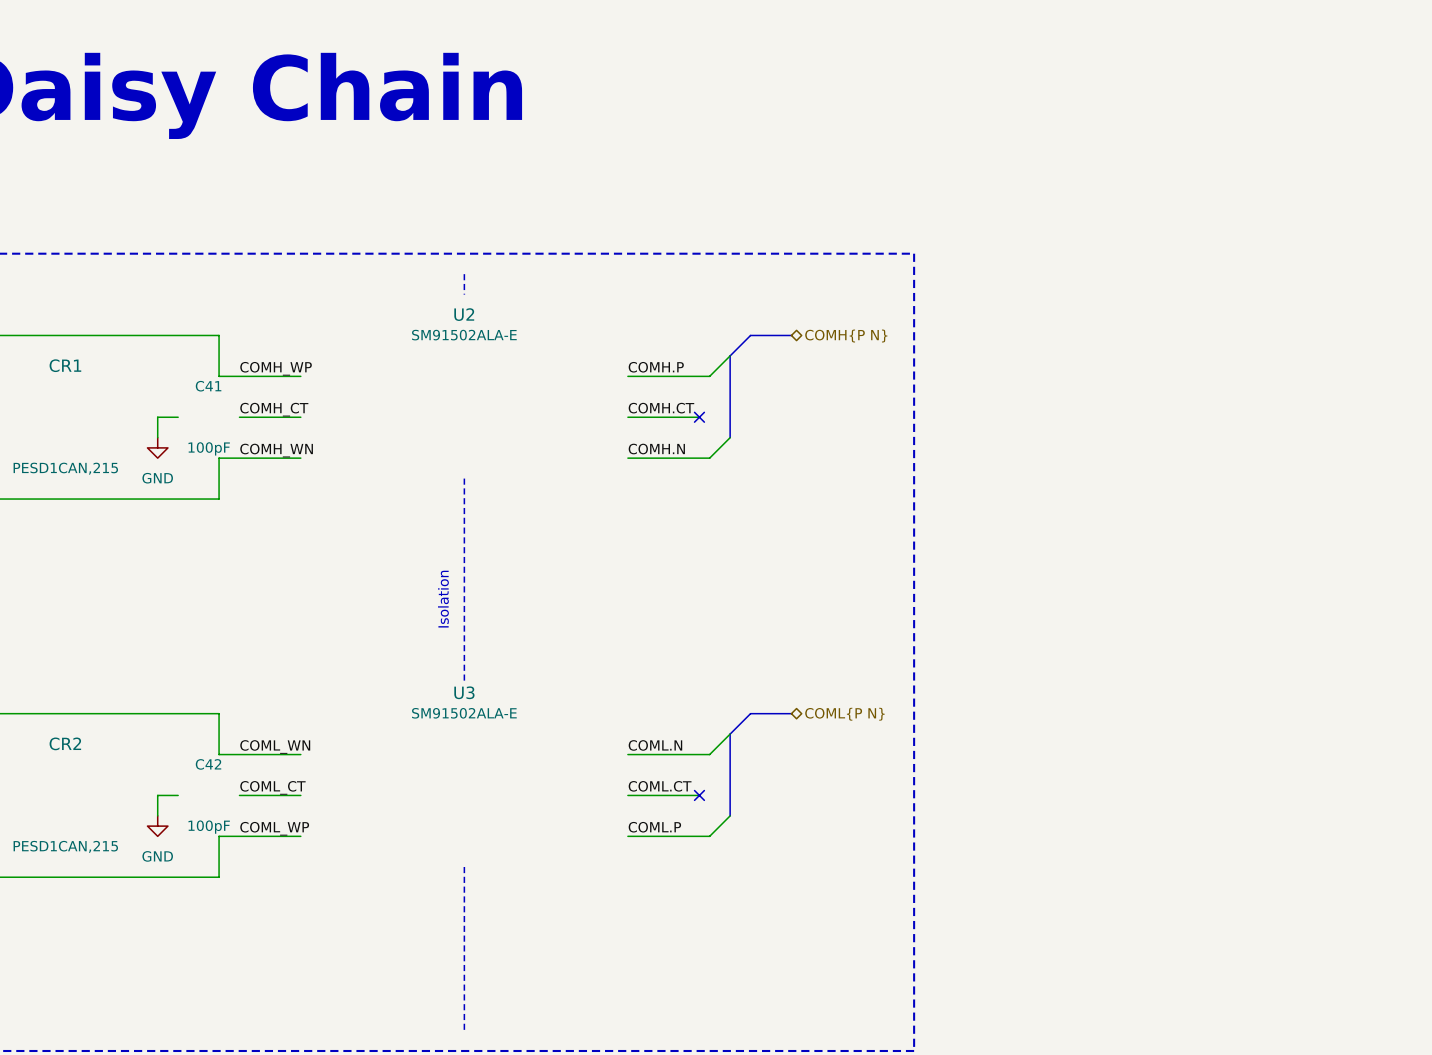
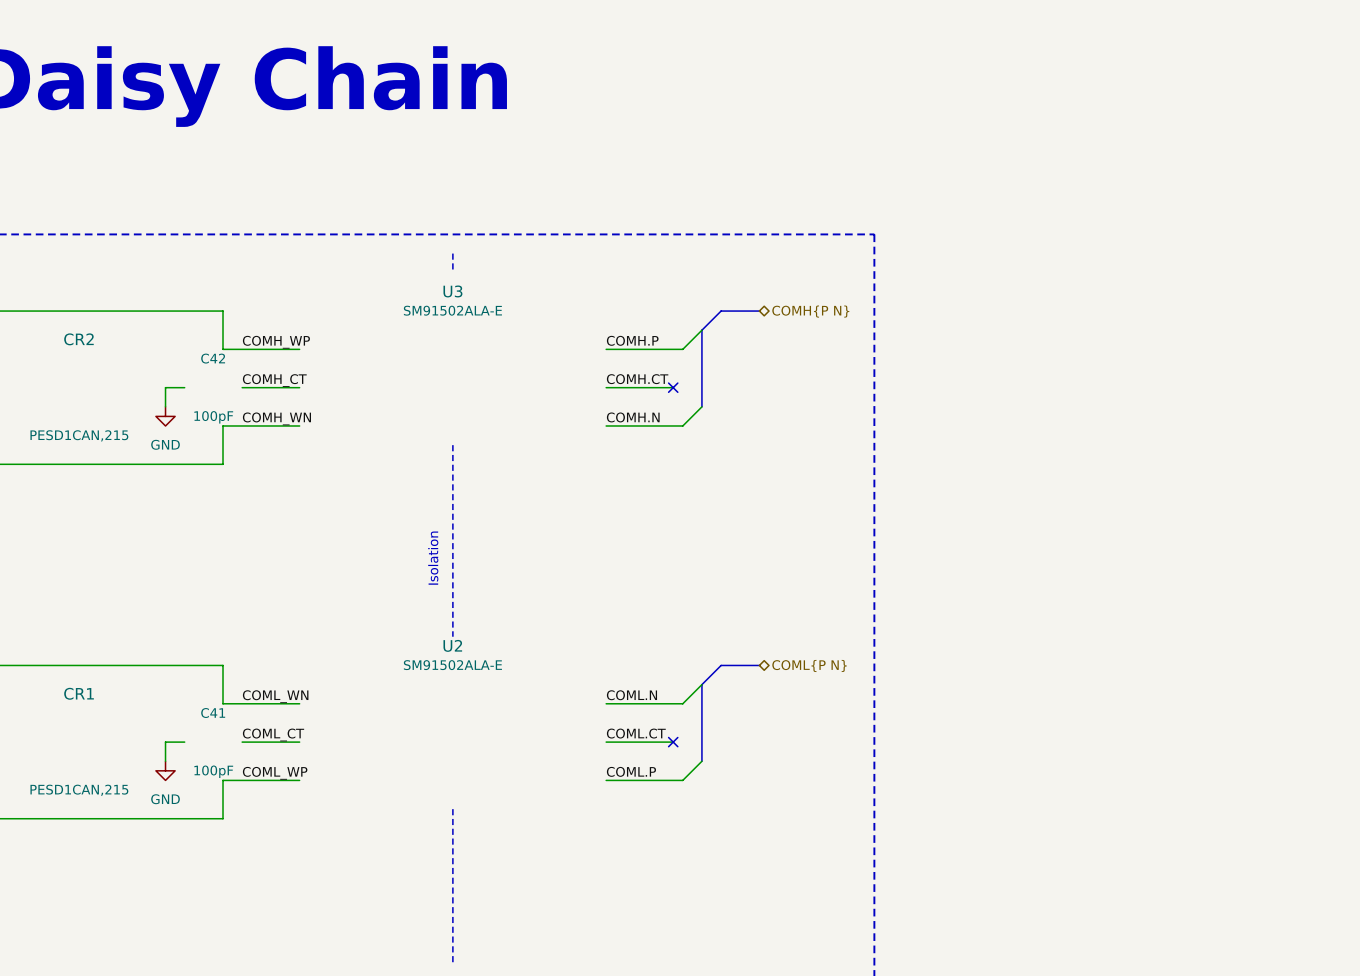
U2 name: U2 (464, 314) -> U3 (452, 291)
CR1 name: CR1 (65, 365) -> CR2 (78, 339)
C41 name: C41 (208, 386) -> C42 (213, 358)
U3 name: U3 (464, 692) -> U2 (452, 645)
CR2 name: CR2 (65, 743) -> CR1 (79, 693)
C42 name: C42 (208, 764) -> C41 (213, 713)

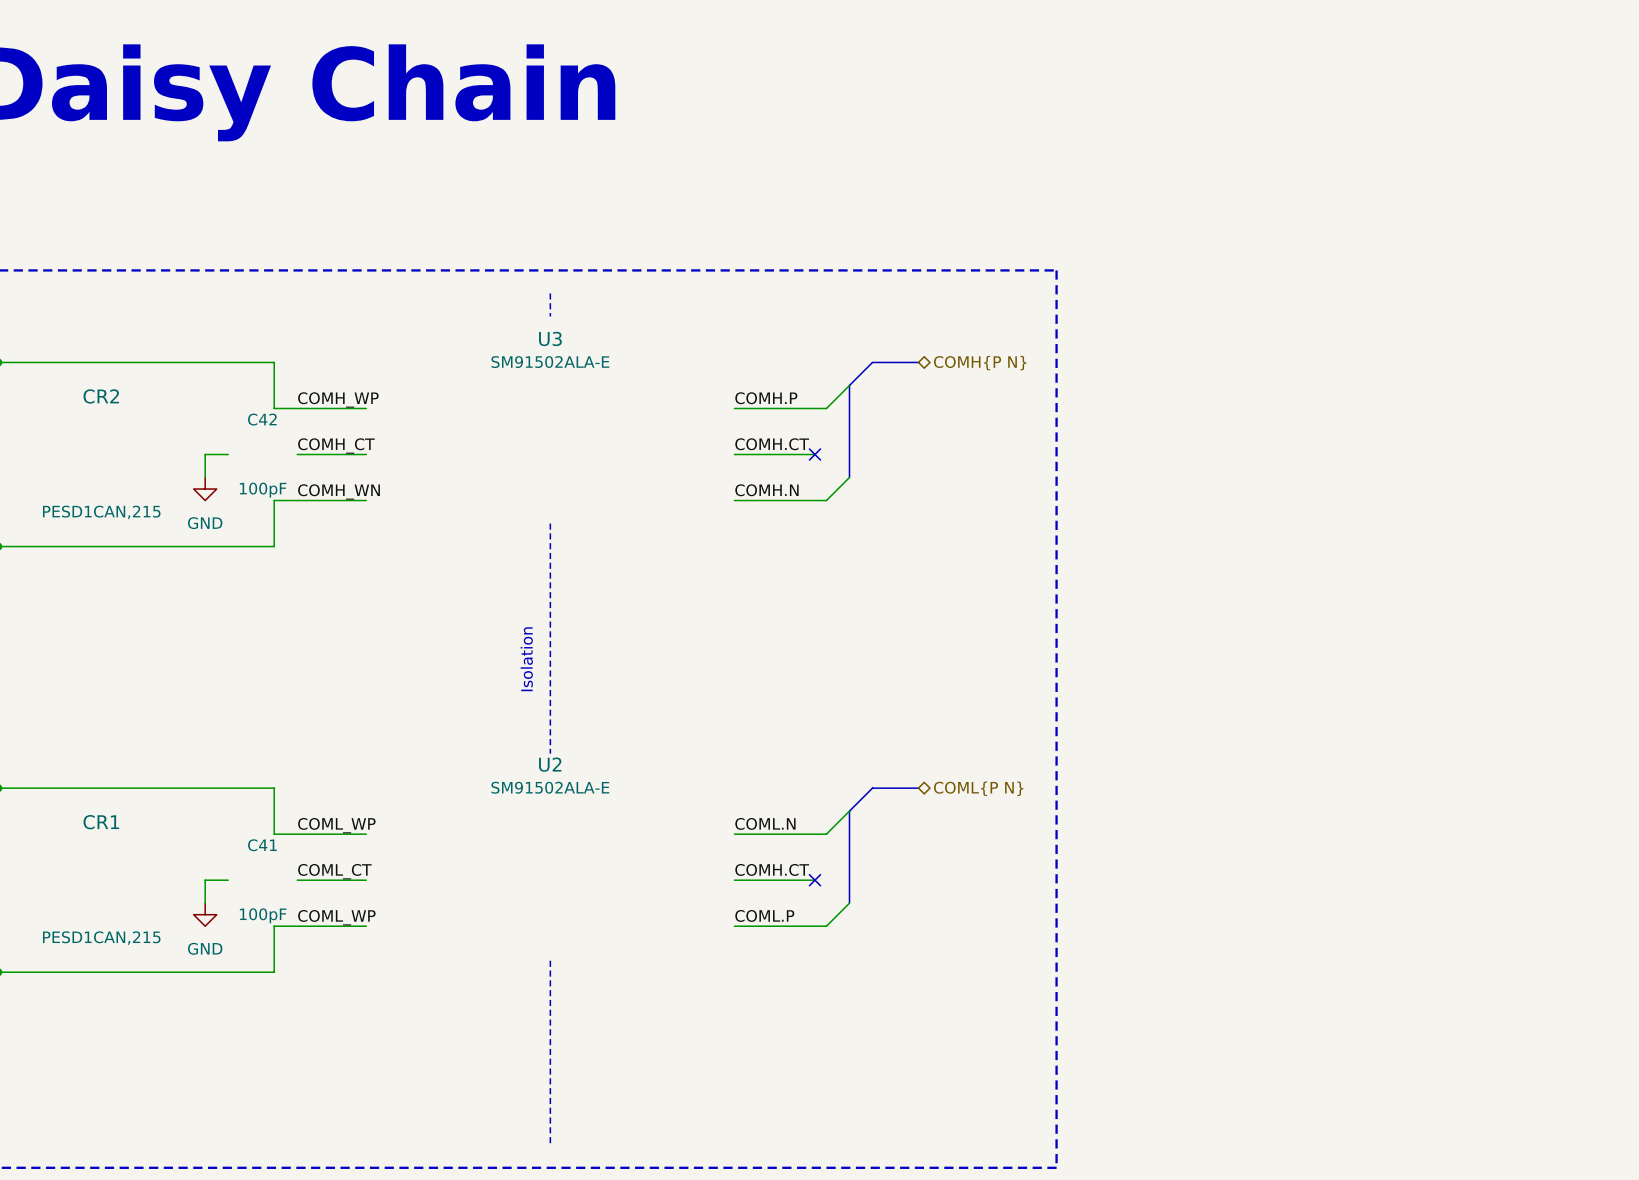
label: COML_WN (275, 696) -> COML_WP (336, 825)
label: COML.CT (636, 733) -> COMH.CT (772, 869)

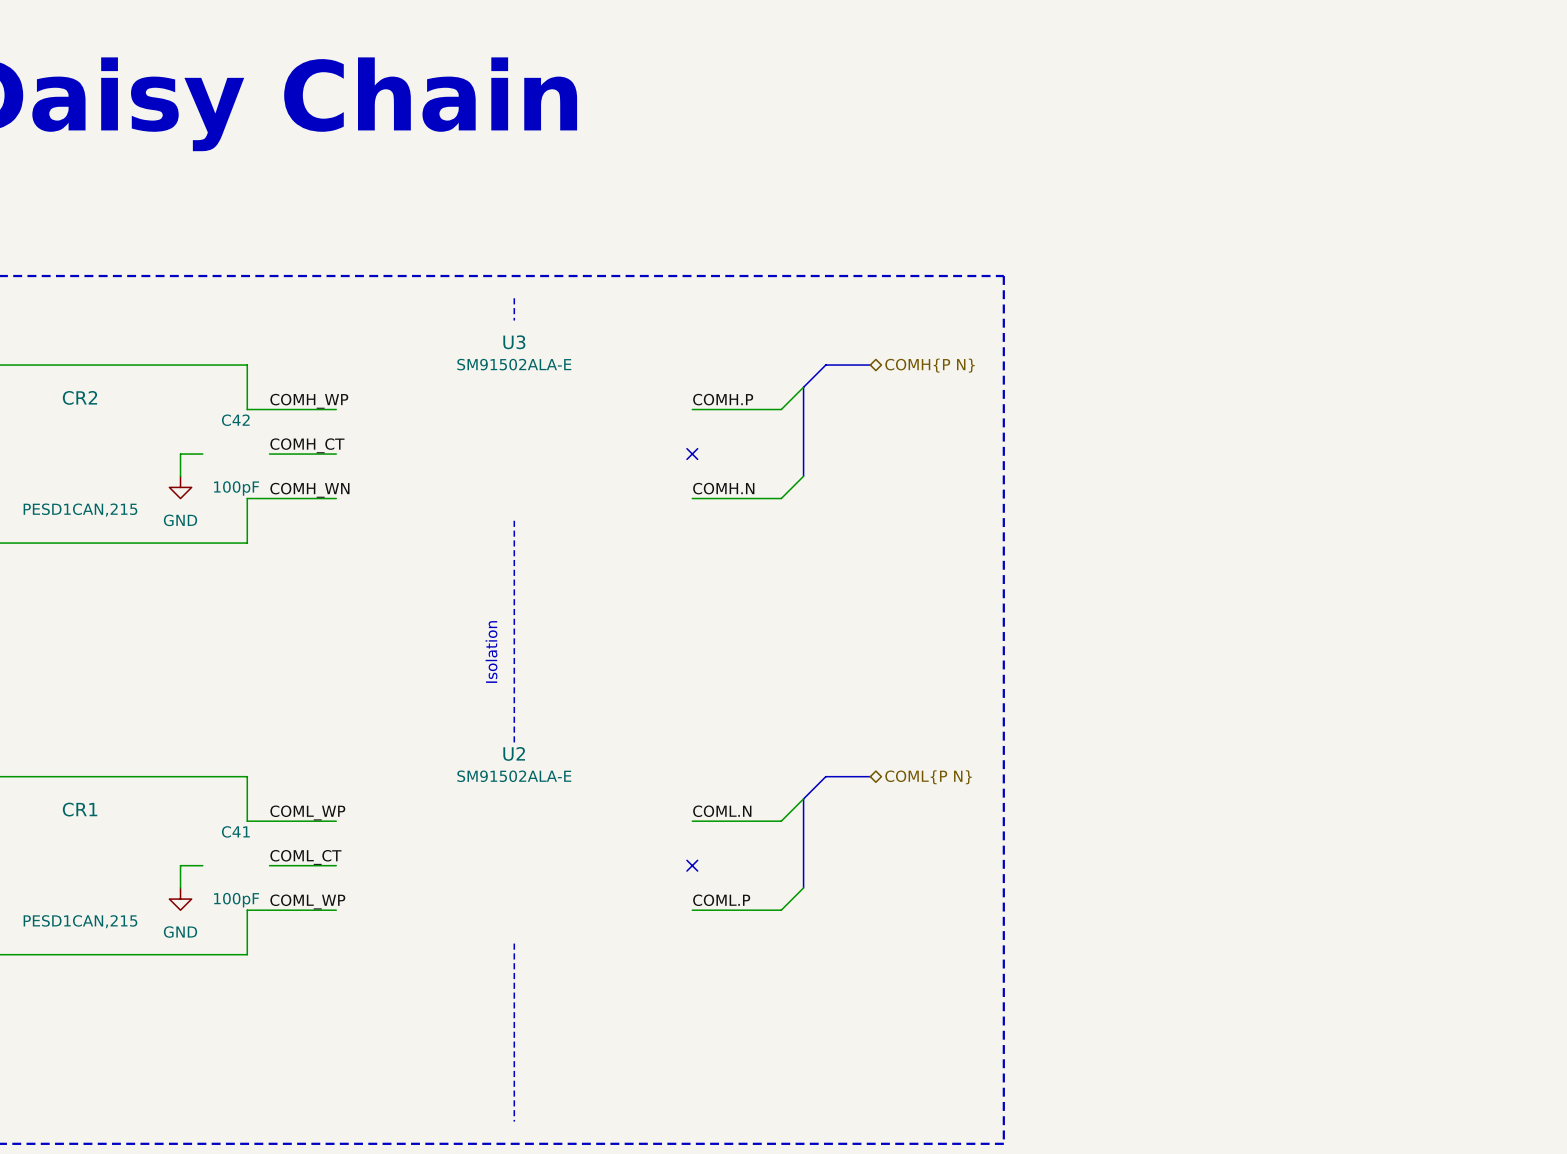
label: COMH.CT (772, 444) -> none
wire: (734, 454) (814, 454) -> none
no-connect mark: none -> (692, 454)
no-connect mark: (814, 454) -> none
label: COMH.CT (772, 869) -> none
wire: (734, 880) (814, 880) -> none
no-connect mark: none -> (692, 865)
no-connect mark: (814, 880) -> none

